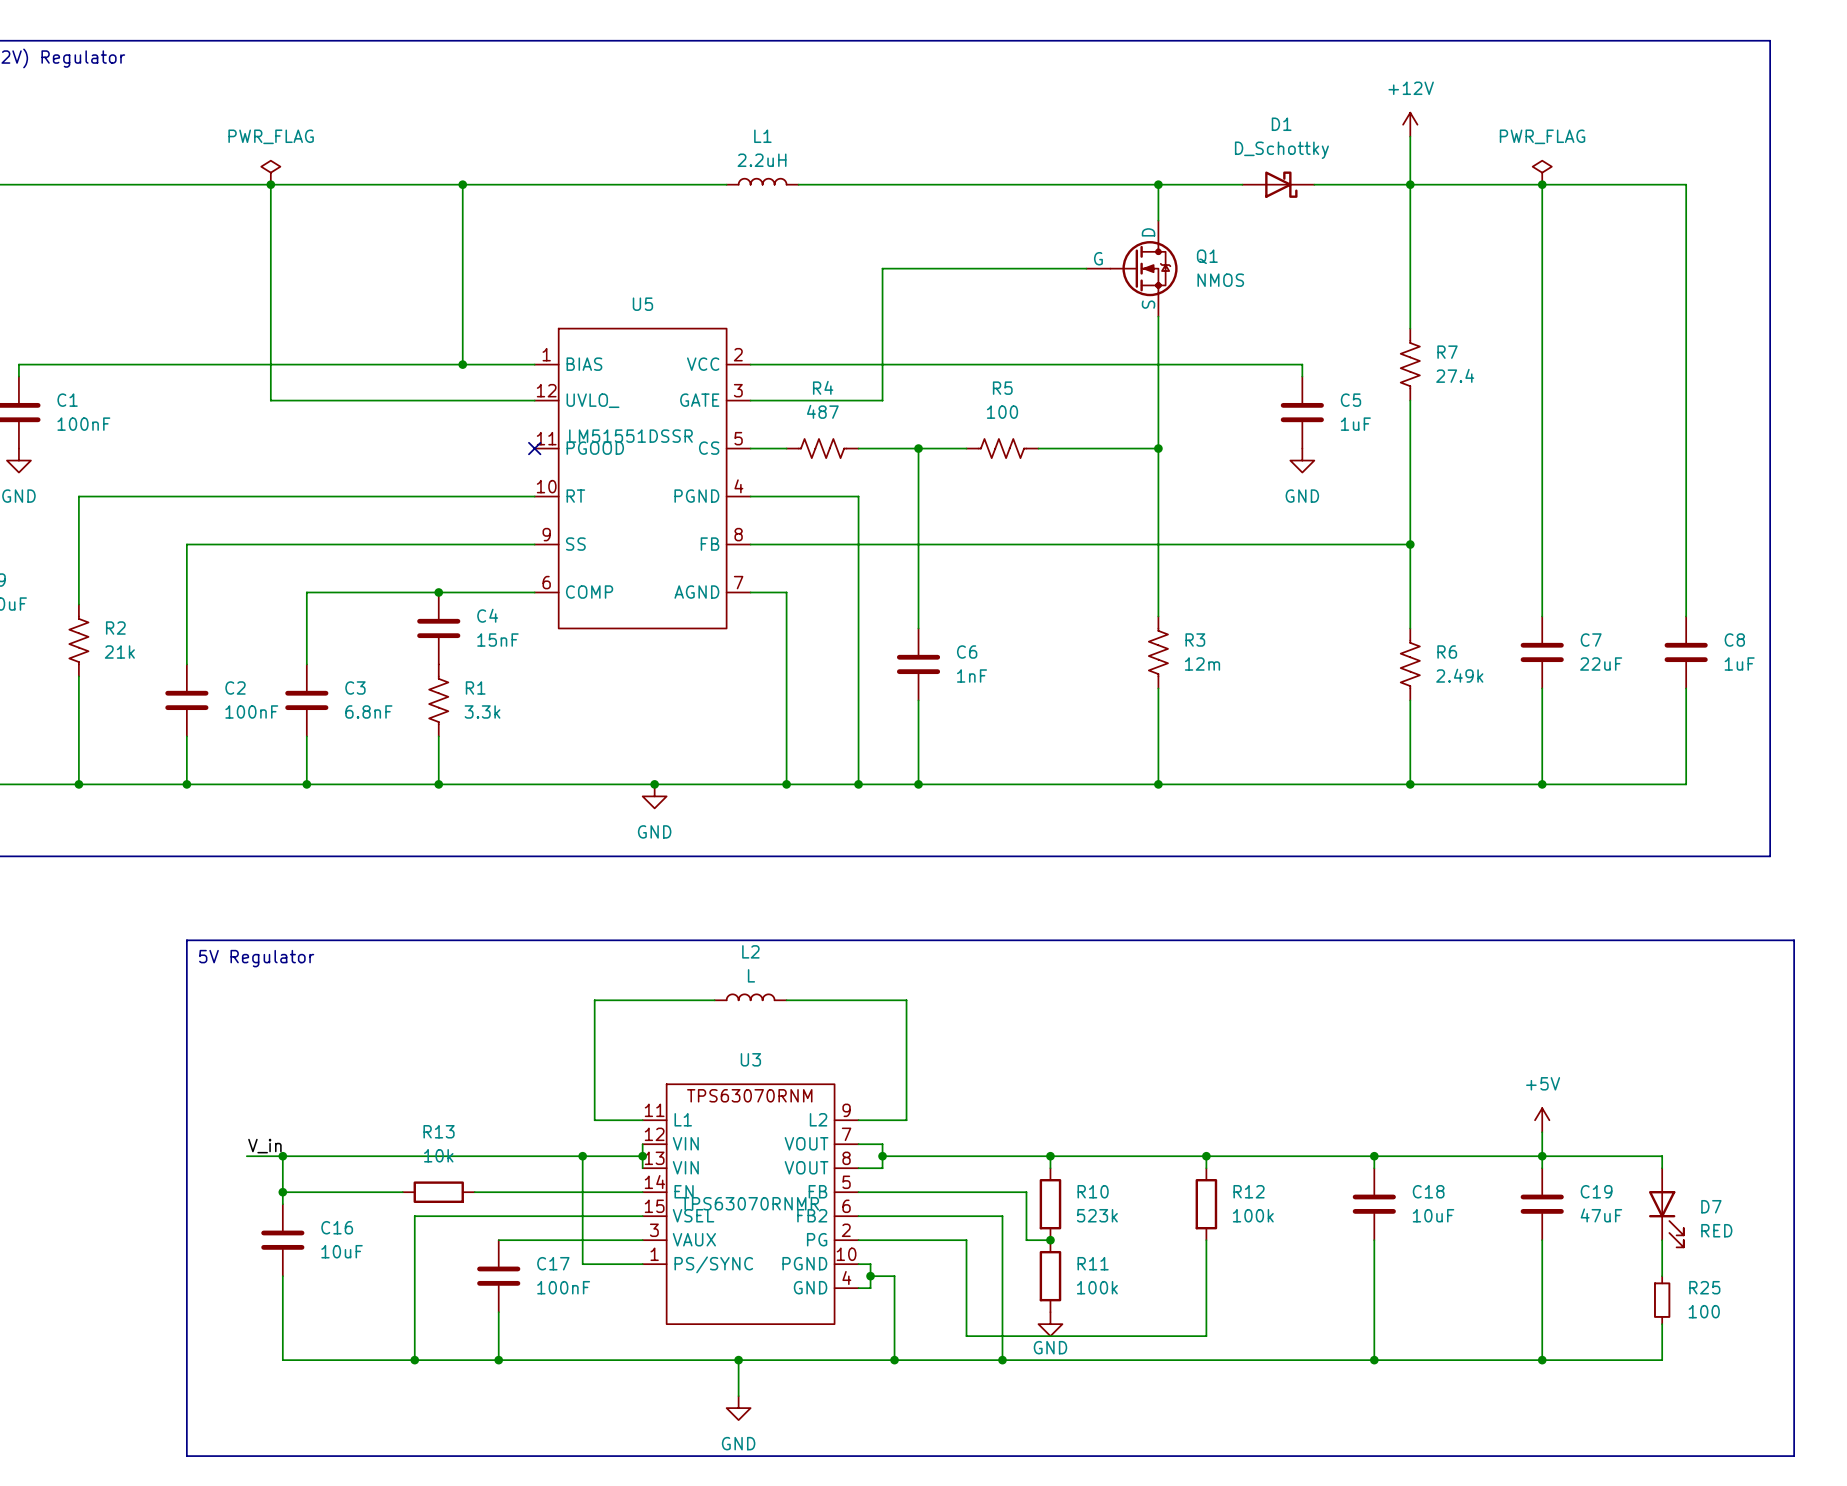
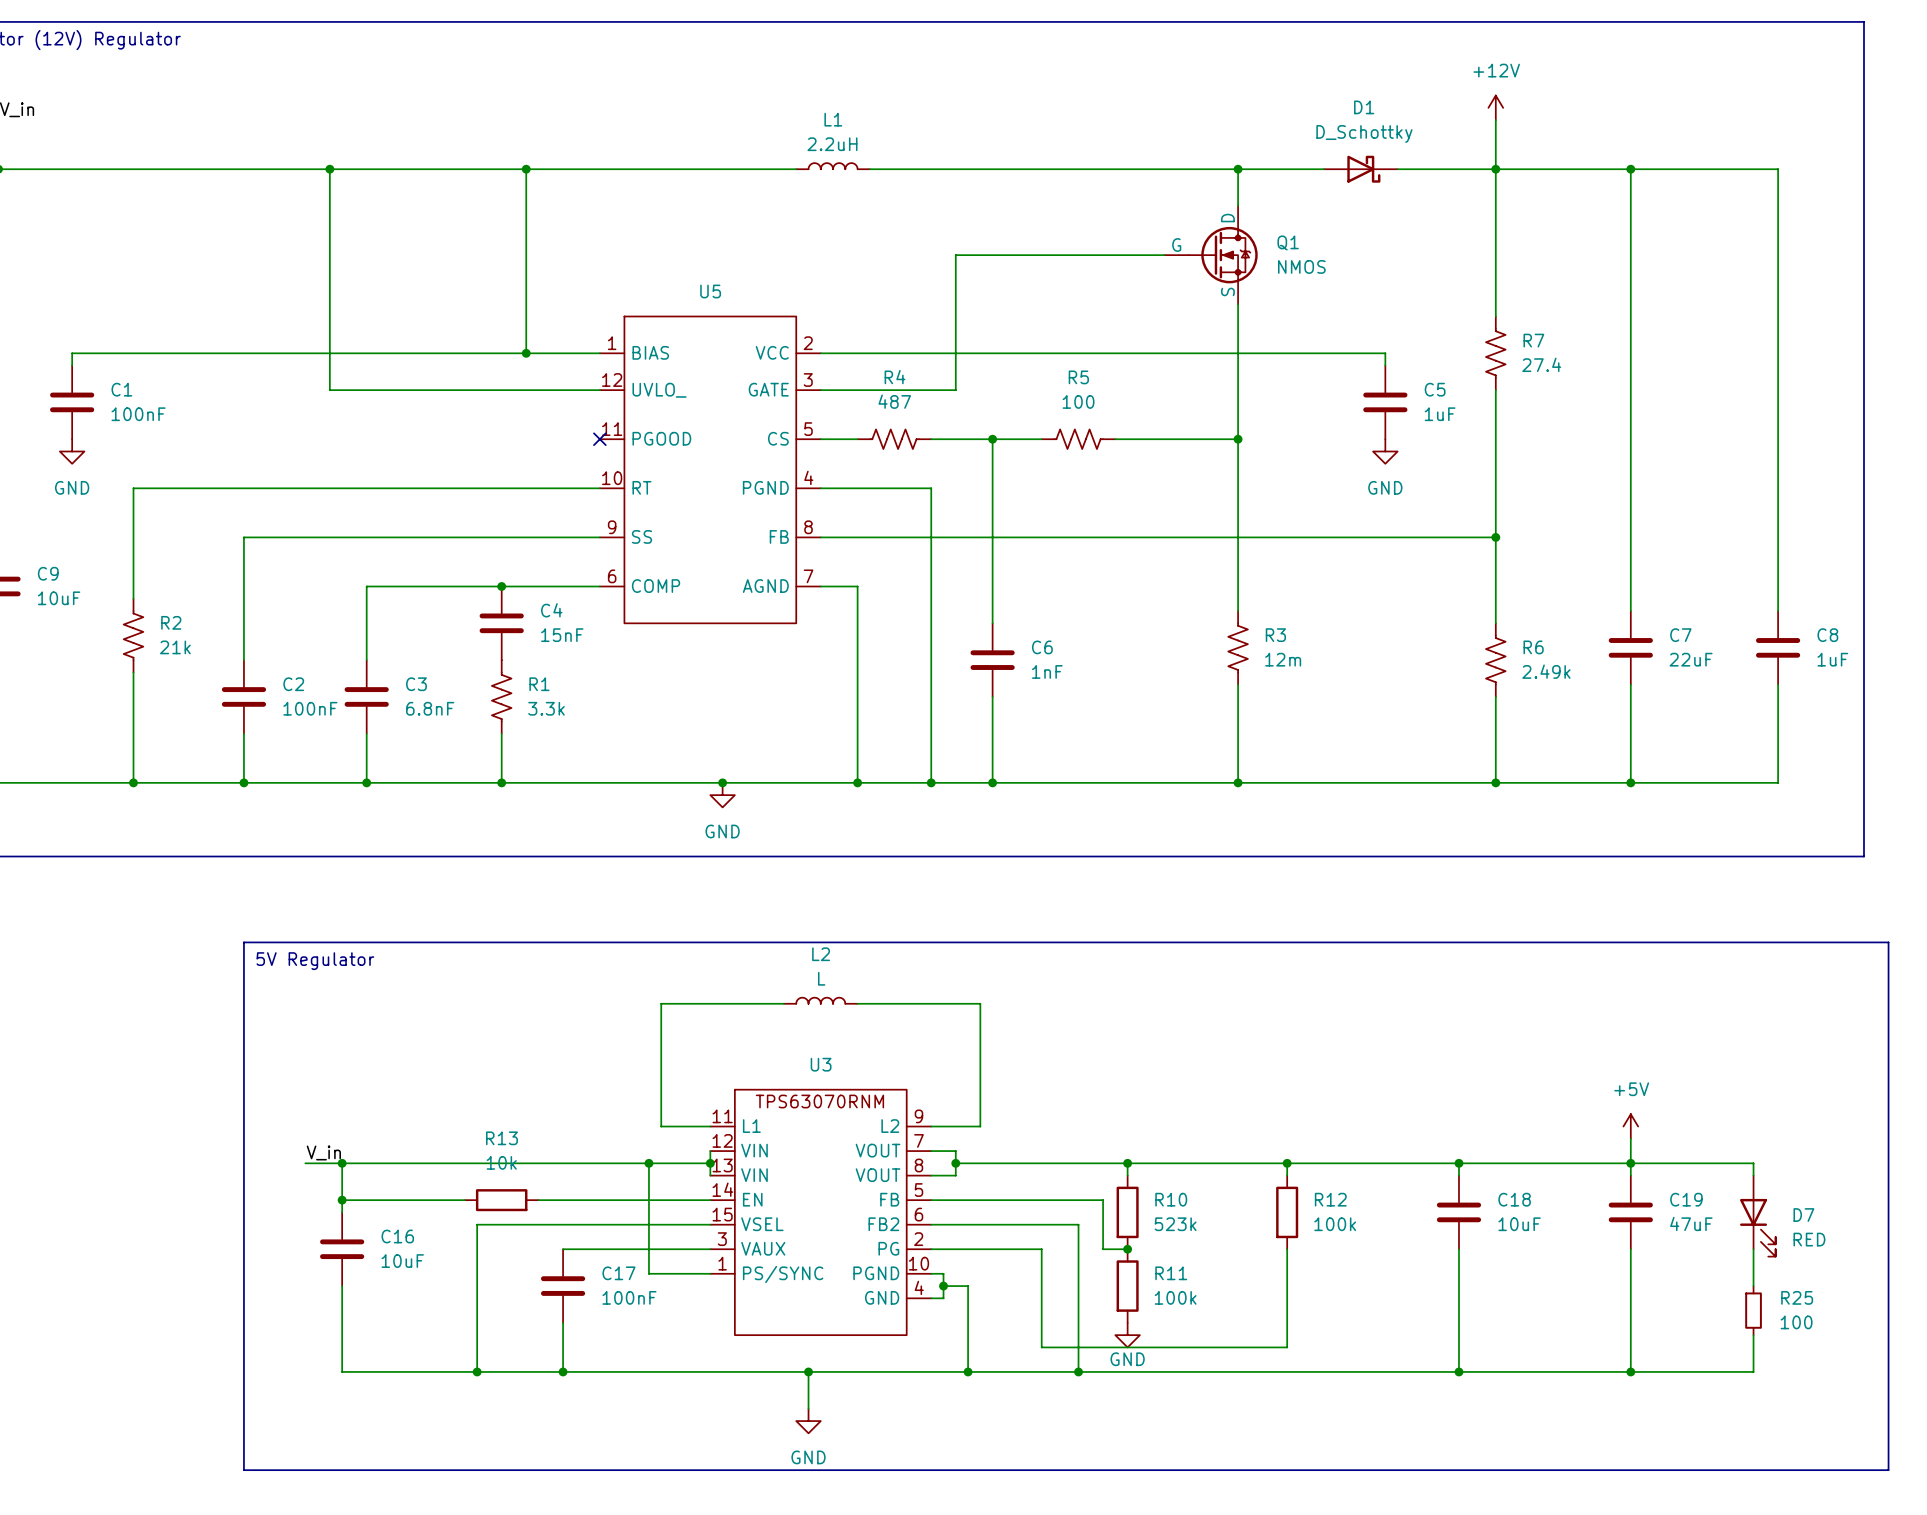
power symbol: PWR_FLAG (270, 172) -> none
power symbol: PWR_FLAG (1542, 172) -> none
U5 value: LM51551DSSR (630, 436) -> none
U3 value: TPS63070RNMR (750, 1203) -> none

